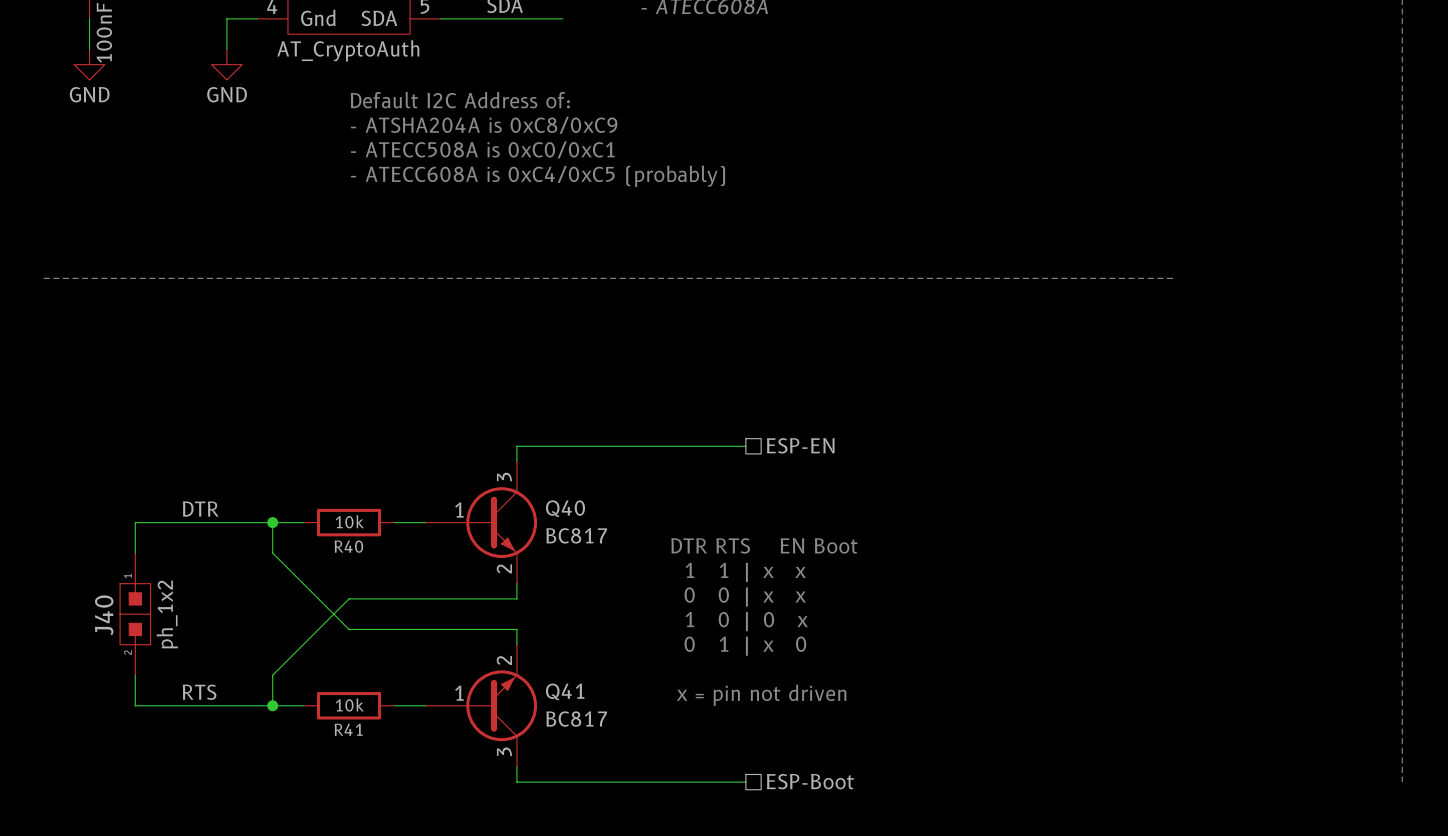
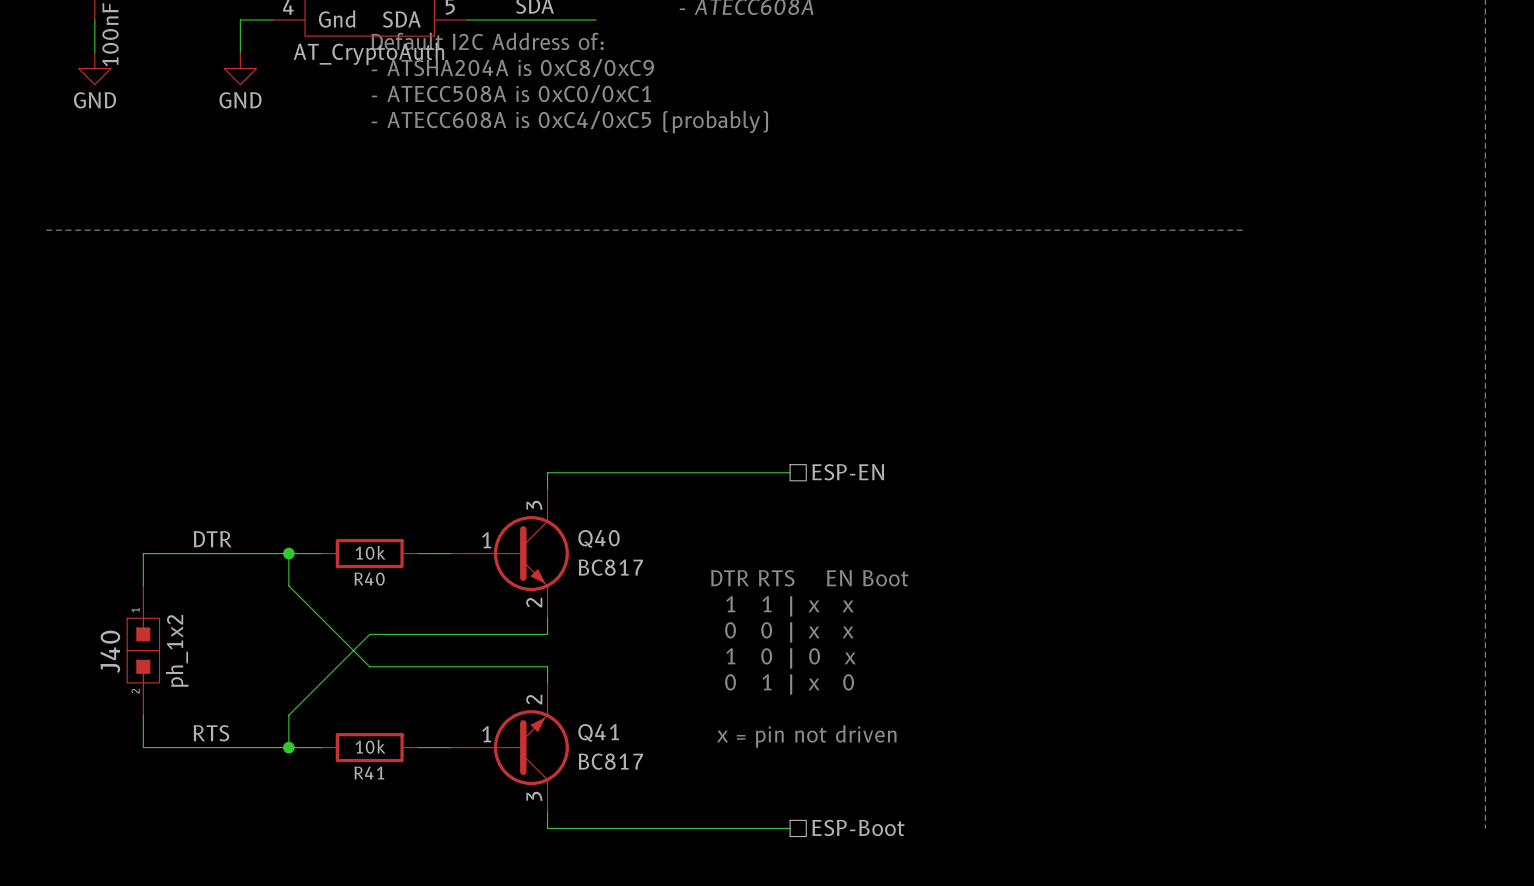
text position: Default I2C Address of: (460, 100) -> Default I2C Address of: (487, 41)
text position: - ATSHA204A is 0xC8/0xC9 (484, 125) -> - ATSHA204A is 0xC8/0xC9 (512, 67)
text position: - ATECC508A is 0xC0/0xC1 (482, 149) -> - ATECC508A is 0xC0/0xC1 (511, 94)
text position: - ATECC608A is 0xC4/0xC5 (probably) (538, 176) -> - ATECC608A is 0xC4/0xC5 (probably) (569, 122)
line: (43, 278) (1173, 278) -> (46, 230) (1242, 230)

